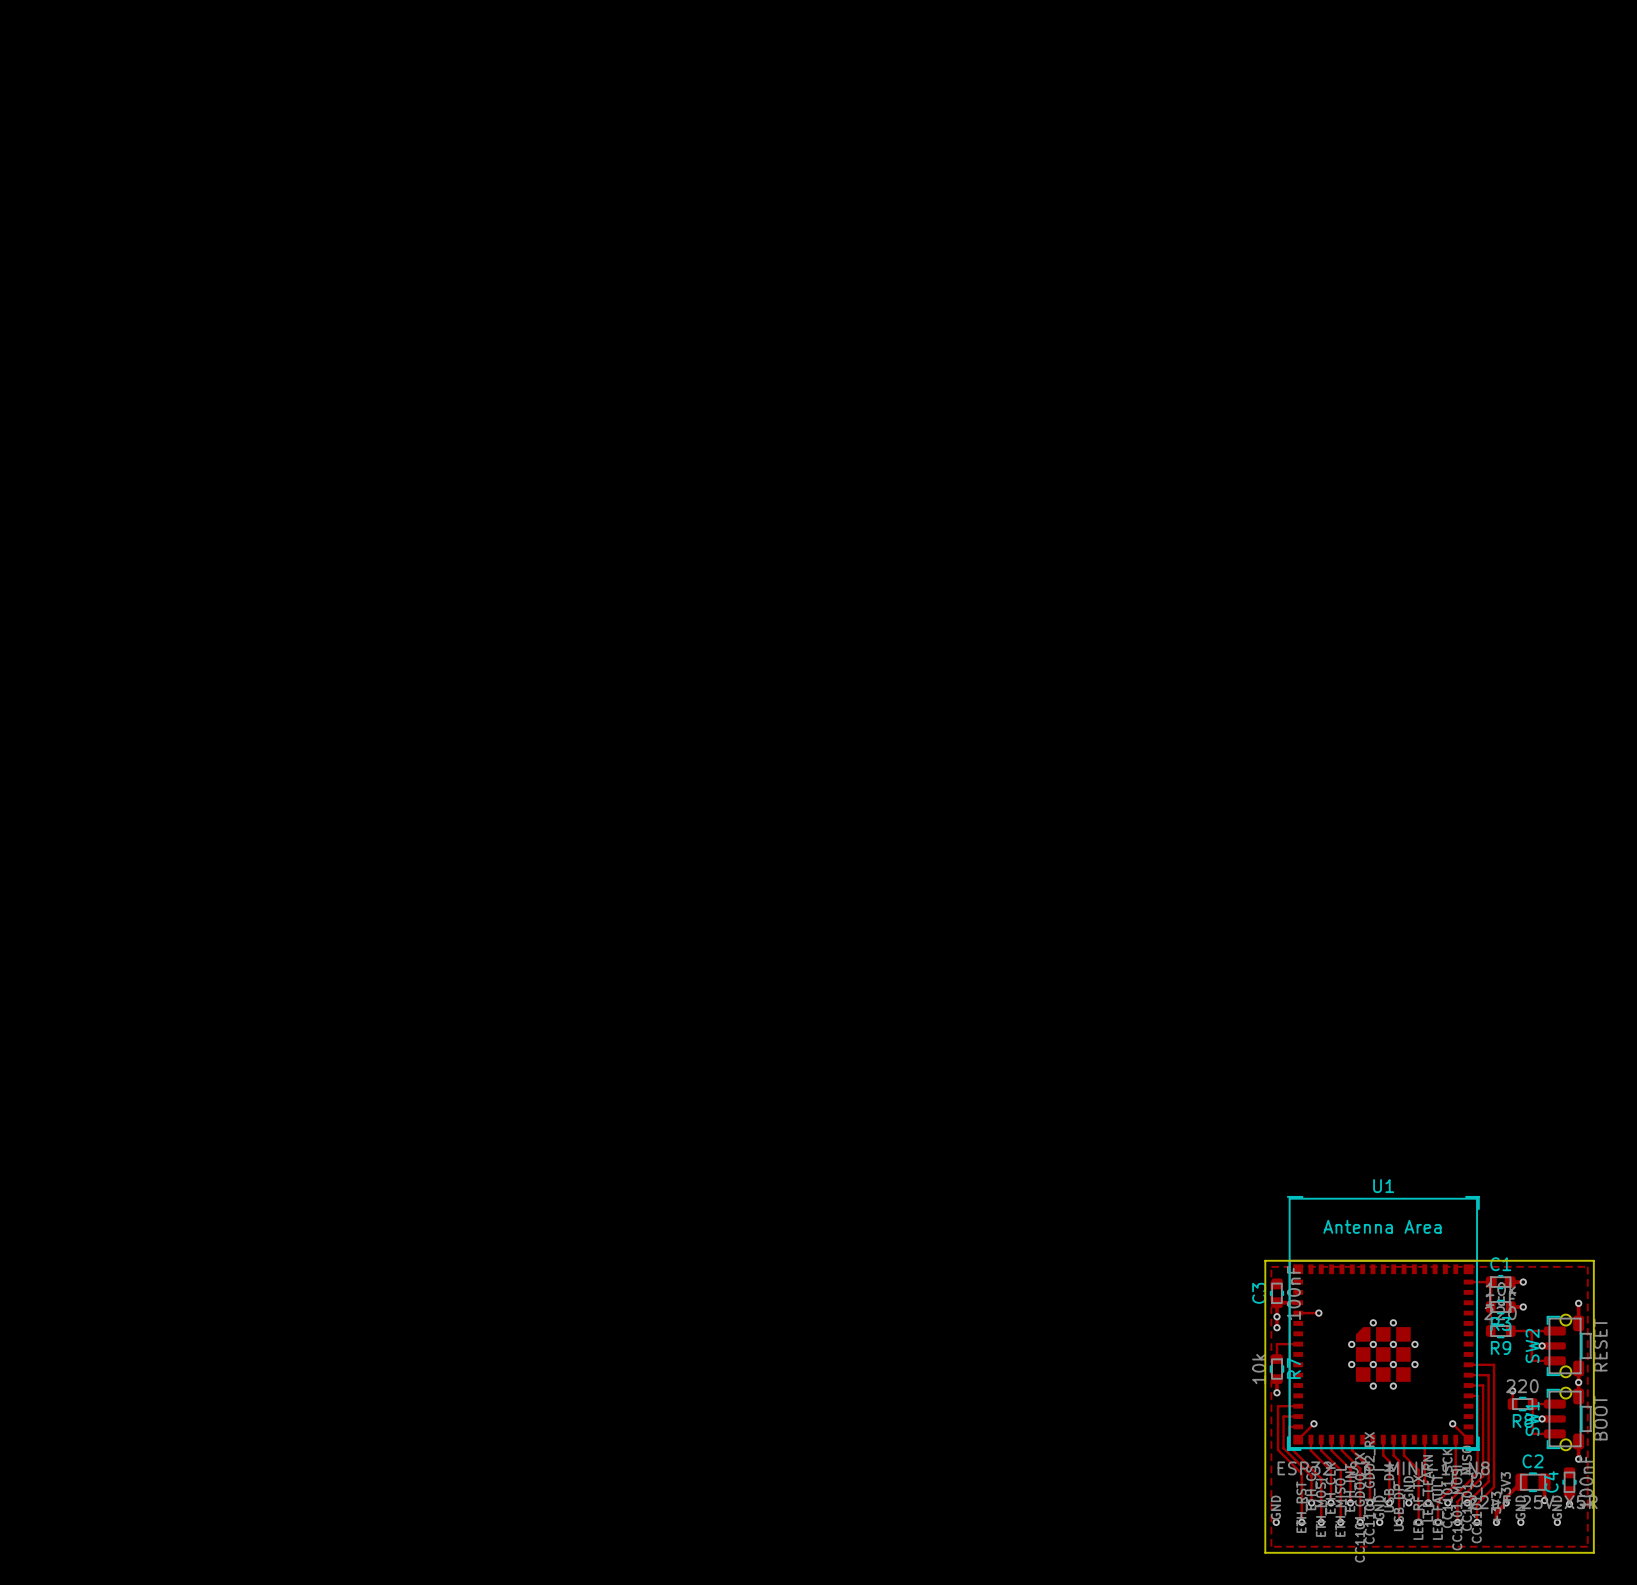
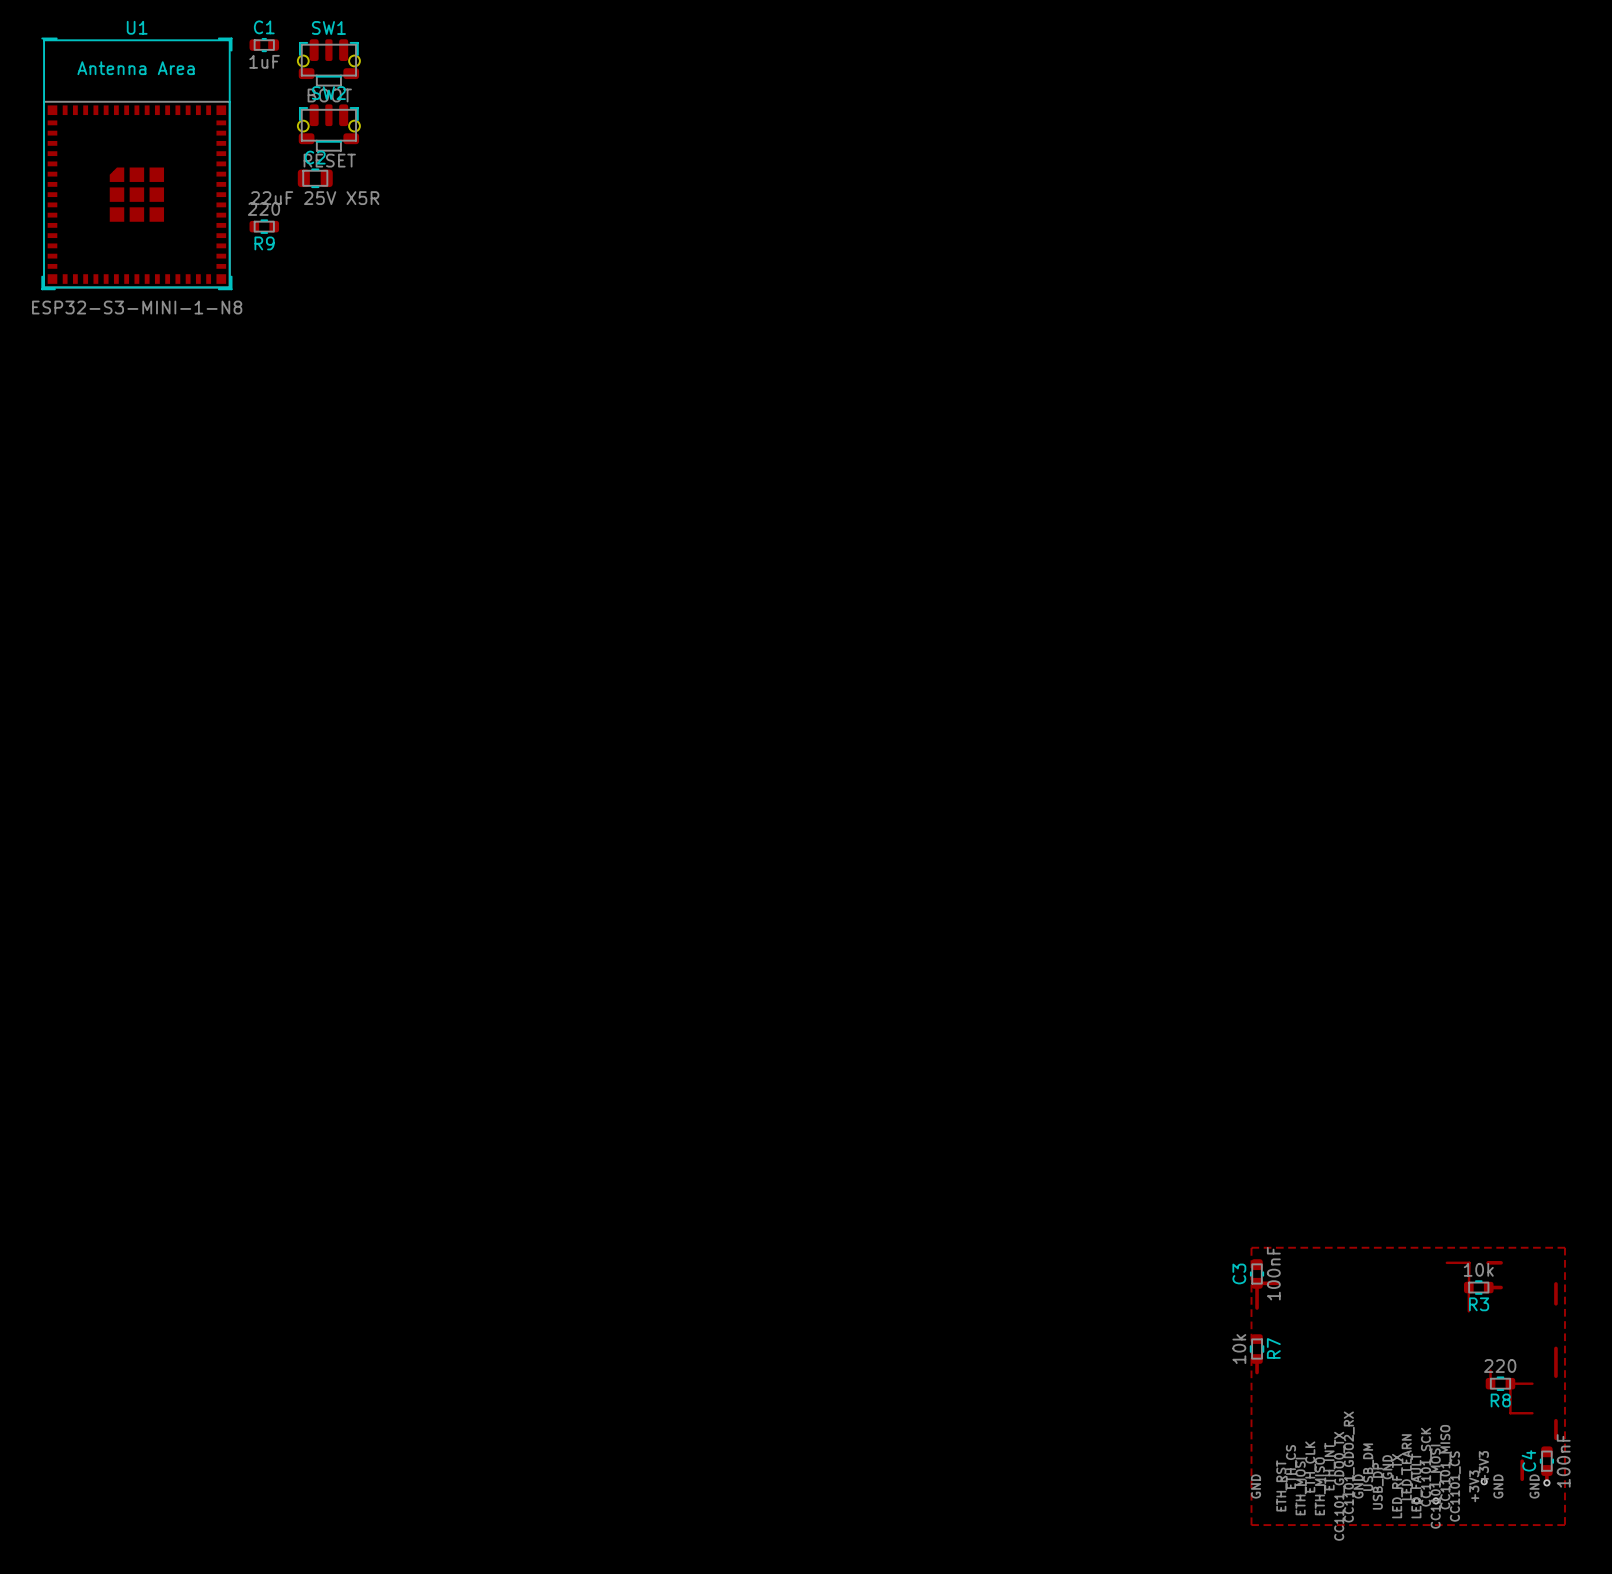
board edge: (1265, 1260) (1593, 1260) (1593, 1552) (1265, 1552) (1265, 1260) -> none
C1 position: (1500, 1282) -> (264, 45)
via: (1523, 1282) -> none
via: (1578, 1303) -> none
via: (1523, 1307) -> none
track: (1298, 1313) (1318, 1313) -> none
via: (1318, 1313) -> none
via: (1276, 1316) -> none
via: (1373, 1322) -> none
via: (1393, 1322) -> none
U1 position: (1383, 1323) -> (136, 163)
via: (1276, 1327) -> none
R9 position: (1500, 1331) -> (264, 226)
track: (1510, 1331) (1554, 1331) -> none
track: (1531, 1331) (1531, 1360) (1554, 1360) -> none
track: (1298, 1344) (1276, 1344) (1276, 1359) -> none
via: (1351, 1344) -> none
via: (1373, 1344) -> none
via: (1393, 1344) -> none
via: (1414, 1344) -> none
via: (1542, 1345) -> none
SW2 rotation: 0° (1567, 1345) -> 90° clockwise (328, 127)
SW2 position: (1567, 1345) -> (328, 127)
via: (1351, 1364) -> none
via: (1373, 1364) -> none
via: (1393, 1364) -> none
via: (1414, 1364) -> none
track: (1468, 1364) (1494, 1364) (1494, 1487) (1477, 1504) (1477, 1522) -> none
track: (1468, 1375) (1488, 1375) (1488, 1481) (1467, 1502) -> none
via: (1578, 1382) -> none
track: (1468, 1385) (1483, 1385) (1483, 1476) (1457, 1501) (1457, 1522) -> none
via: (1373, 1386) -> none
via: (1393, 1386) -> none
via: (1512, 1390) -> none
via: (1276, 1392) -> none
track: (1468, 1395) (1477, 1395) (1477, 1473) (1447, 1502) -> none
track: (1298, 1406) (1278, 1406) (1278, 1449) (1301, 1473) (1301, 1522) -> none
track: (1298, 1416) (1283, 1416) (1283, 1448) (1311, 1476) (1311, 1502) -> none
via: (1542, 1418) -> none
SW1 rotation: 0° (1567, 1418) -> 90° clockwise (328, 62)
SW1 position: (1567, 1418) -> (328, 62)
track: (1313, 1423) (1298, 1439) -> none
via: (1313, 1423) -> none
track: (1452, 1423) (1468, 1439) -> none
via: (1452, 1423) -> none
track: (1298, 1426) (1289, 1426) (1289, 1446) (1321, 1478) (1321, 1522) -> none
track: (1310, 1439) (1310, 1450) (1331, 1470) (1331, 1502) -> none
track: (1321, 1439) (1321, 1450) (1340, 1470) (1340, 1522) -> none
track: (1331, 1439) (1331, 1450) (1350, 1469) (1350, 1502) -> none
track: (1341, 1439) (1341, 1450) (1360, 1468) (1360, 1522) -> none
track: (1352, 1439) (1352, 1450) (1369, 1468) (1369, 1502) -> none
track: (1383, 1439) (1383, 1455) (1389, 1461) (1389, 1502) -> none
track: (1393, 1439) (1393, 1455) (1399, 1460) (1399, 1522) -> none
track: (1404, 1439) (1404, 1455) (1418, 1470) (1418, 1522) -> none
track: (1424, 1439) (1424, 1479) (1428, 1483) (1428, 1502) -> none
track: (1455, 1439) (1455, 1484) (1438, 1501) (1438, 1522) -> none
via: (1578, 1459) -> none
track: (1521, 1482) (1506, 1497) (1506, 1502) (1496, 1512) (1496, 1522) -> none
C2 position: (1533, 1482) -> (315, 178)
via: (1544, 1500) -> none
via: (1311, 1502) -> none
via: (1331, 1502) -> none
via: (1350, 1502) -> none
via: (1369, 1502) -> none
via: (1389, 1502) -> none
via: (1408, 1502) -> none
via: (1428, 1502) -> none
via: (1447, 1502) -> none
via: (1467, 1502) -> none
via: (1276, 1522) -> none
via: (1301, 1522) -> none
via: (1321, 1522) -> none
via: (1340, 1522) -> none
via: (1360, 1522) -> none
via: (1379, 1522) -> none
via: (1399, 1522) -> none
via: (1418, 1522) -> none
via: (1477, 1522) -> none
via: (1496, 1522) -> none
via: (1520, 1522) -> none
via: (1557, 1522) -> none

